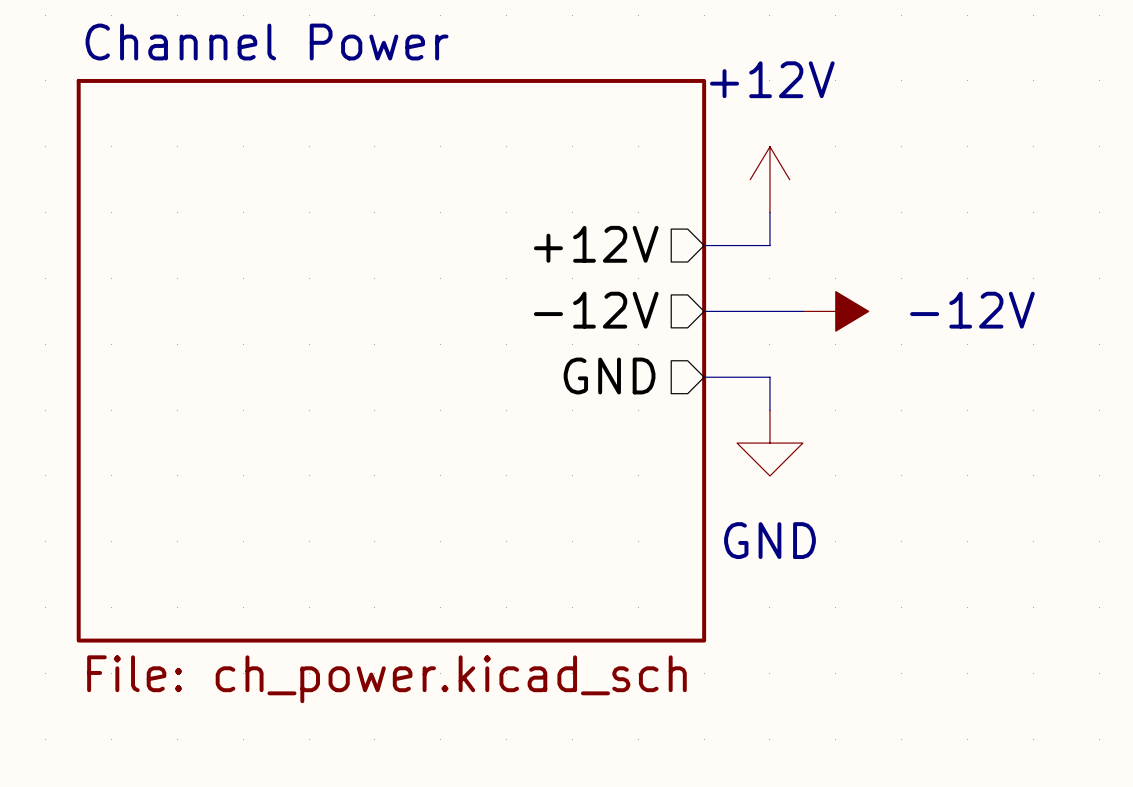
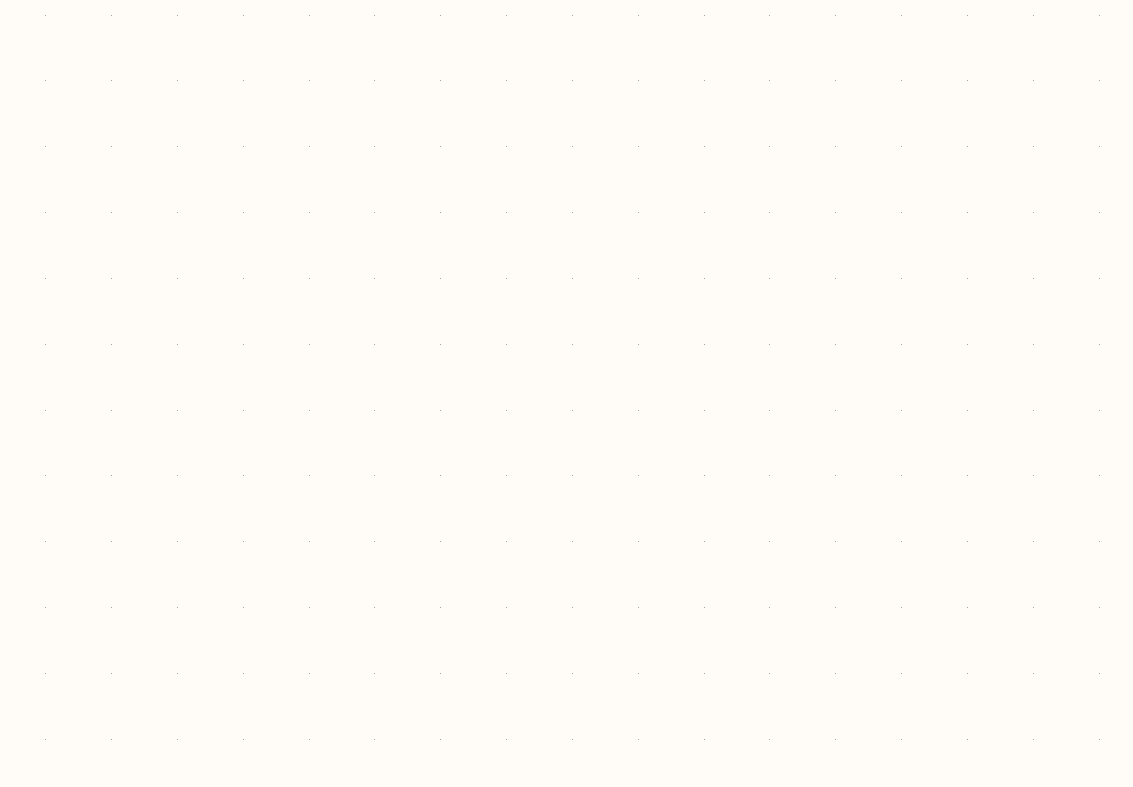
power symbol: +12V (769, 179) -> none
wire: (769, 212) (769, 245) (704, 245) -> none
sheet pin: +12V (596, 244) -> none
sheet pin: -12V (596, 310) -> none
wire: (704, 311) (802, 311) -> none
power symbol: -12V (835, 311) -> none
sheet Channel Power: File: ch_power.kicad_sch (391, 360) -> none
sheet pin: GND (609, 375) -> none
wire: (704, 377) (769, 377) (769, 410) -> none
power symbol: GND (769, 443) -> none

